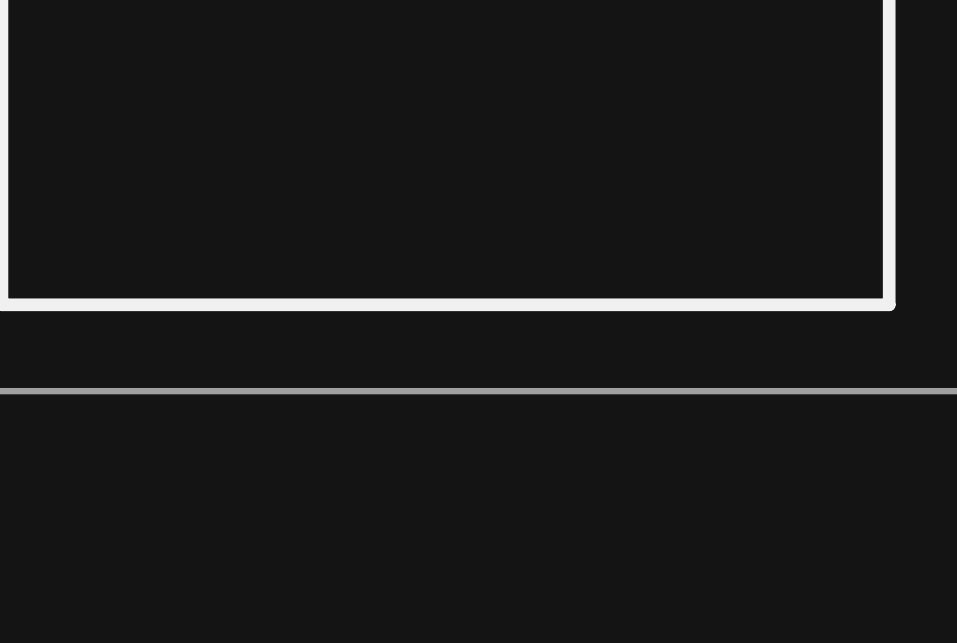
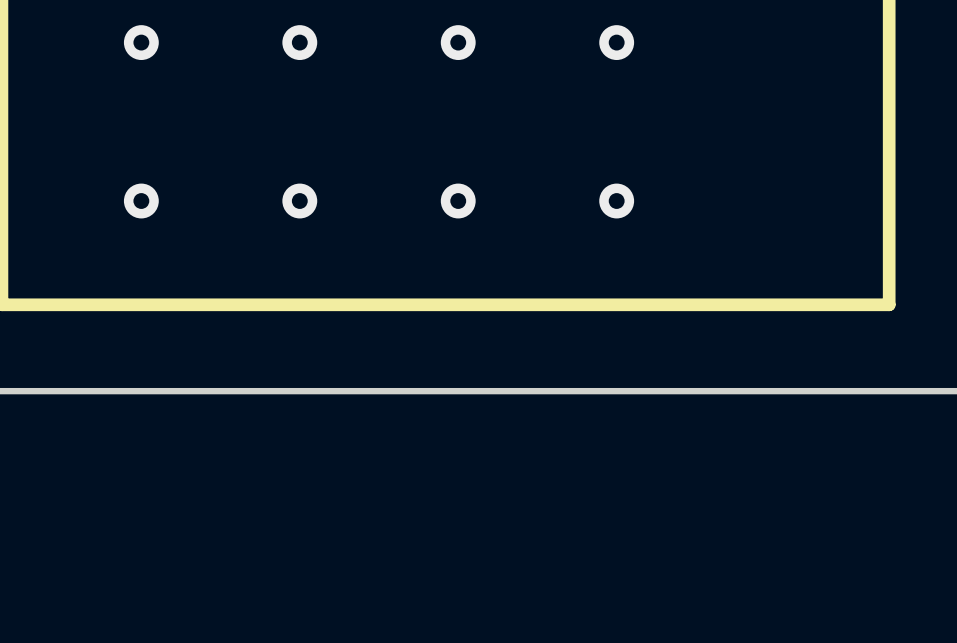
via: none -> (141, 42)
via: none -> (299, 42)
via: none -> (458, 42)
via: none -> (616, 42)
via: none -> (141, 201)
via: none -> (299, 201)
via: none -> (458, 201)
via: none -> (616, 201)

